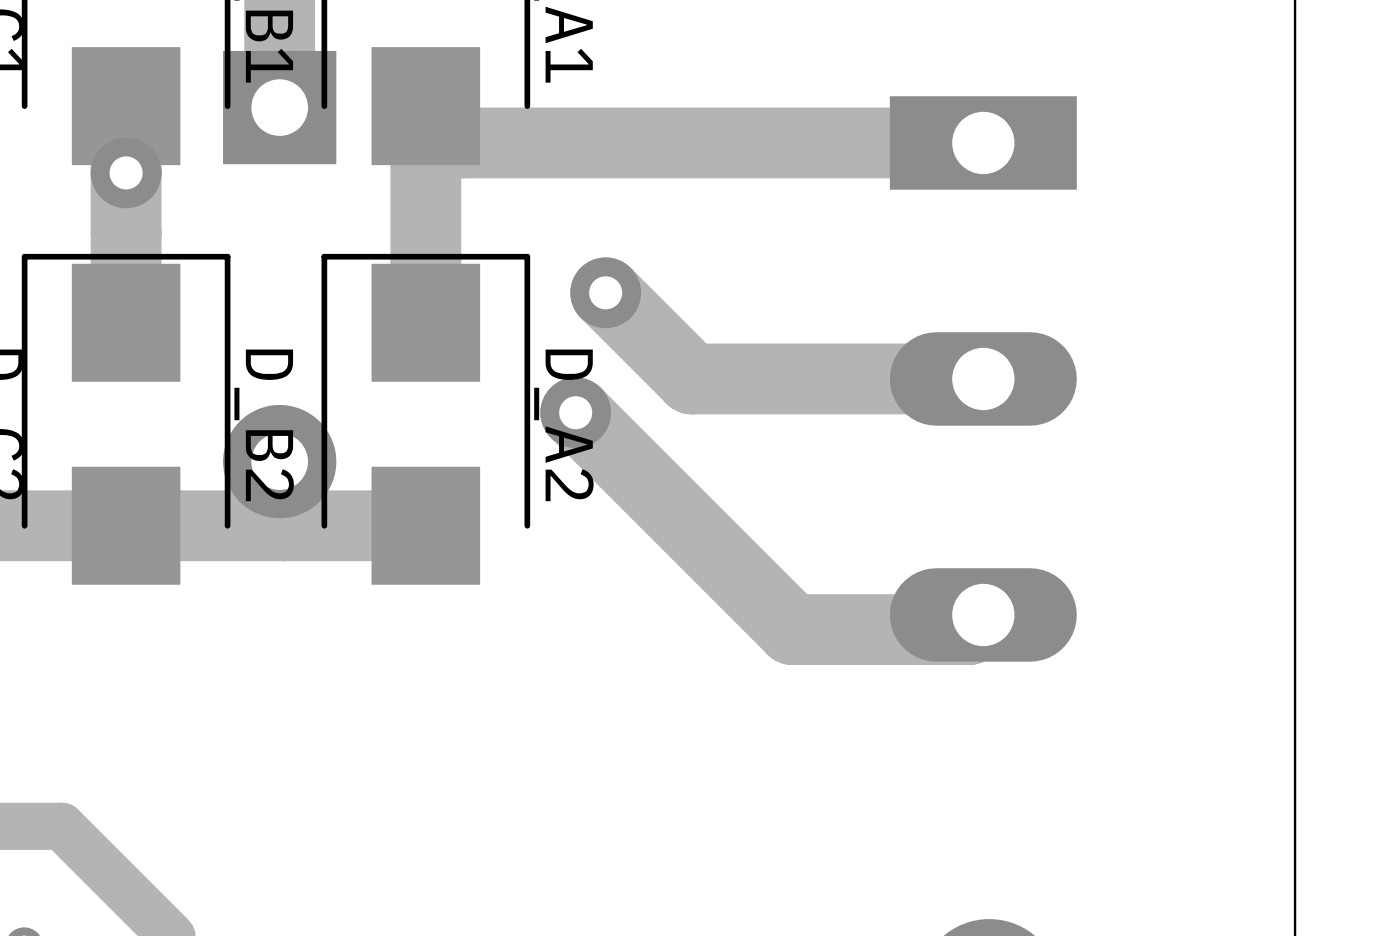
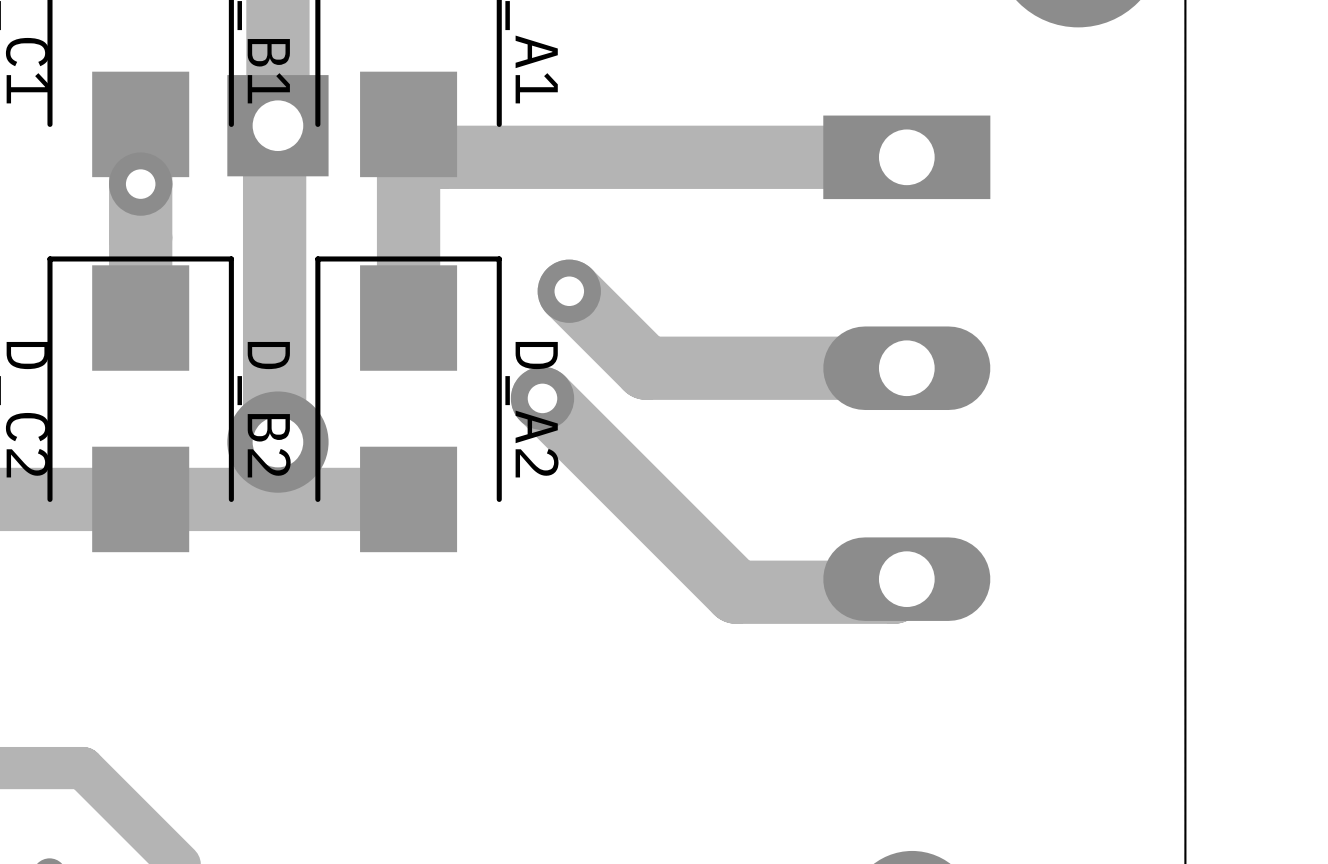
track: none -> (274, 130) (274, 493)

